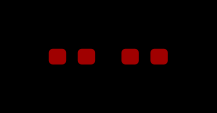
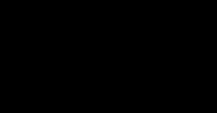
part: (71, 56) -> none
part: (144, 56) -> none

